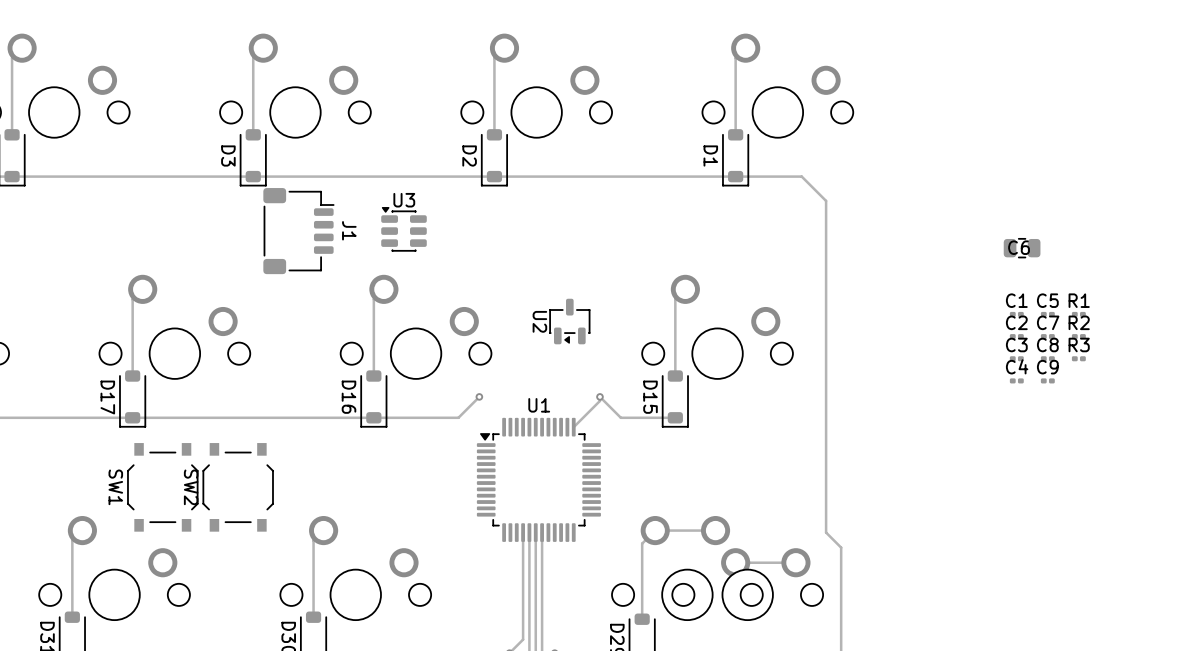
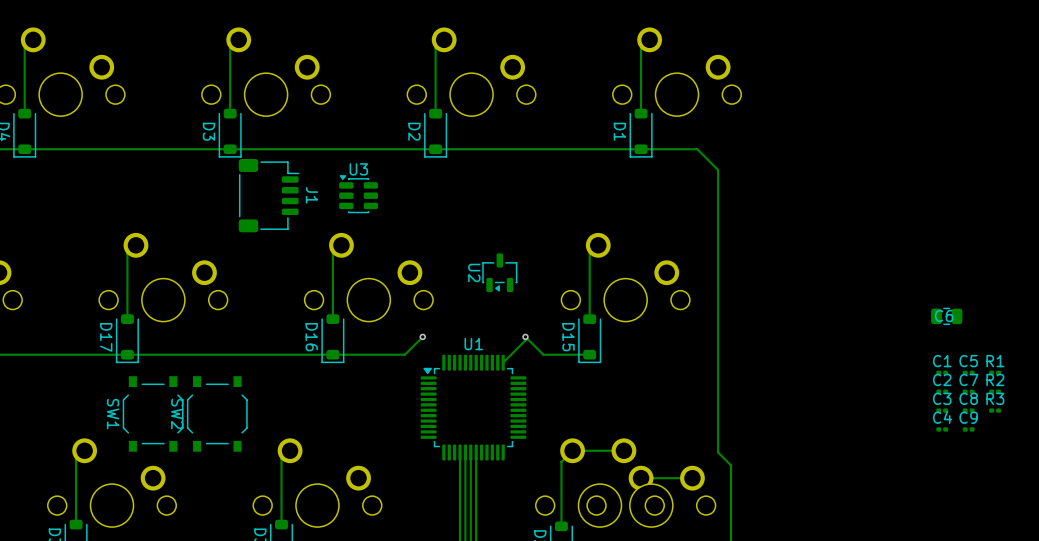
C6 position: (1022, 248) -> (946, 316)
C1 position: (1016, 314) -> (942, 372)
C5 position: (1047, 314) -> (968, 372)
R1 position: (1078, 314) -> (995, 372)
C2 position: (1016, 336) -> (942, 391)
C7 position: (1047, 336) -> (968, 391)
R2 position: (1078, 336) -> (995, 391)
C3 position: (1016, 358) -> (942, 410)
C8 position: (1047, 358) -> (968, 410)
R3 position: (1078, 358) -> (995, 410)
C4 position: (1016, 380) -> (942, 429)
C9 position: (1047, 380) -> (968, 429)

